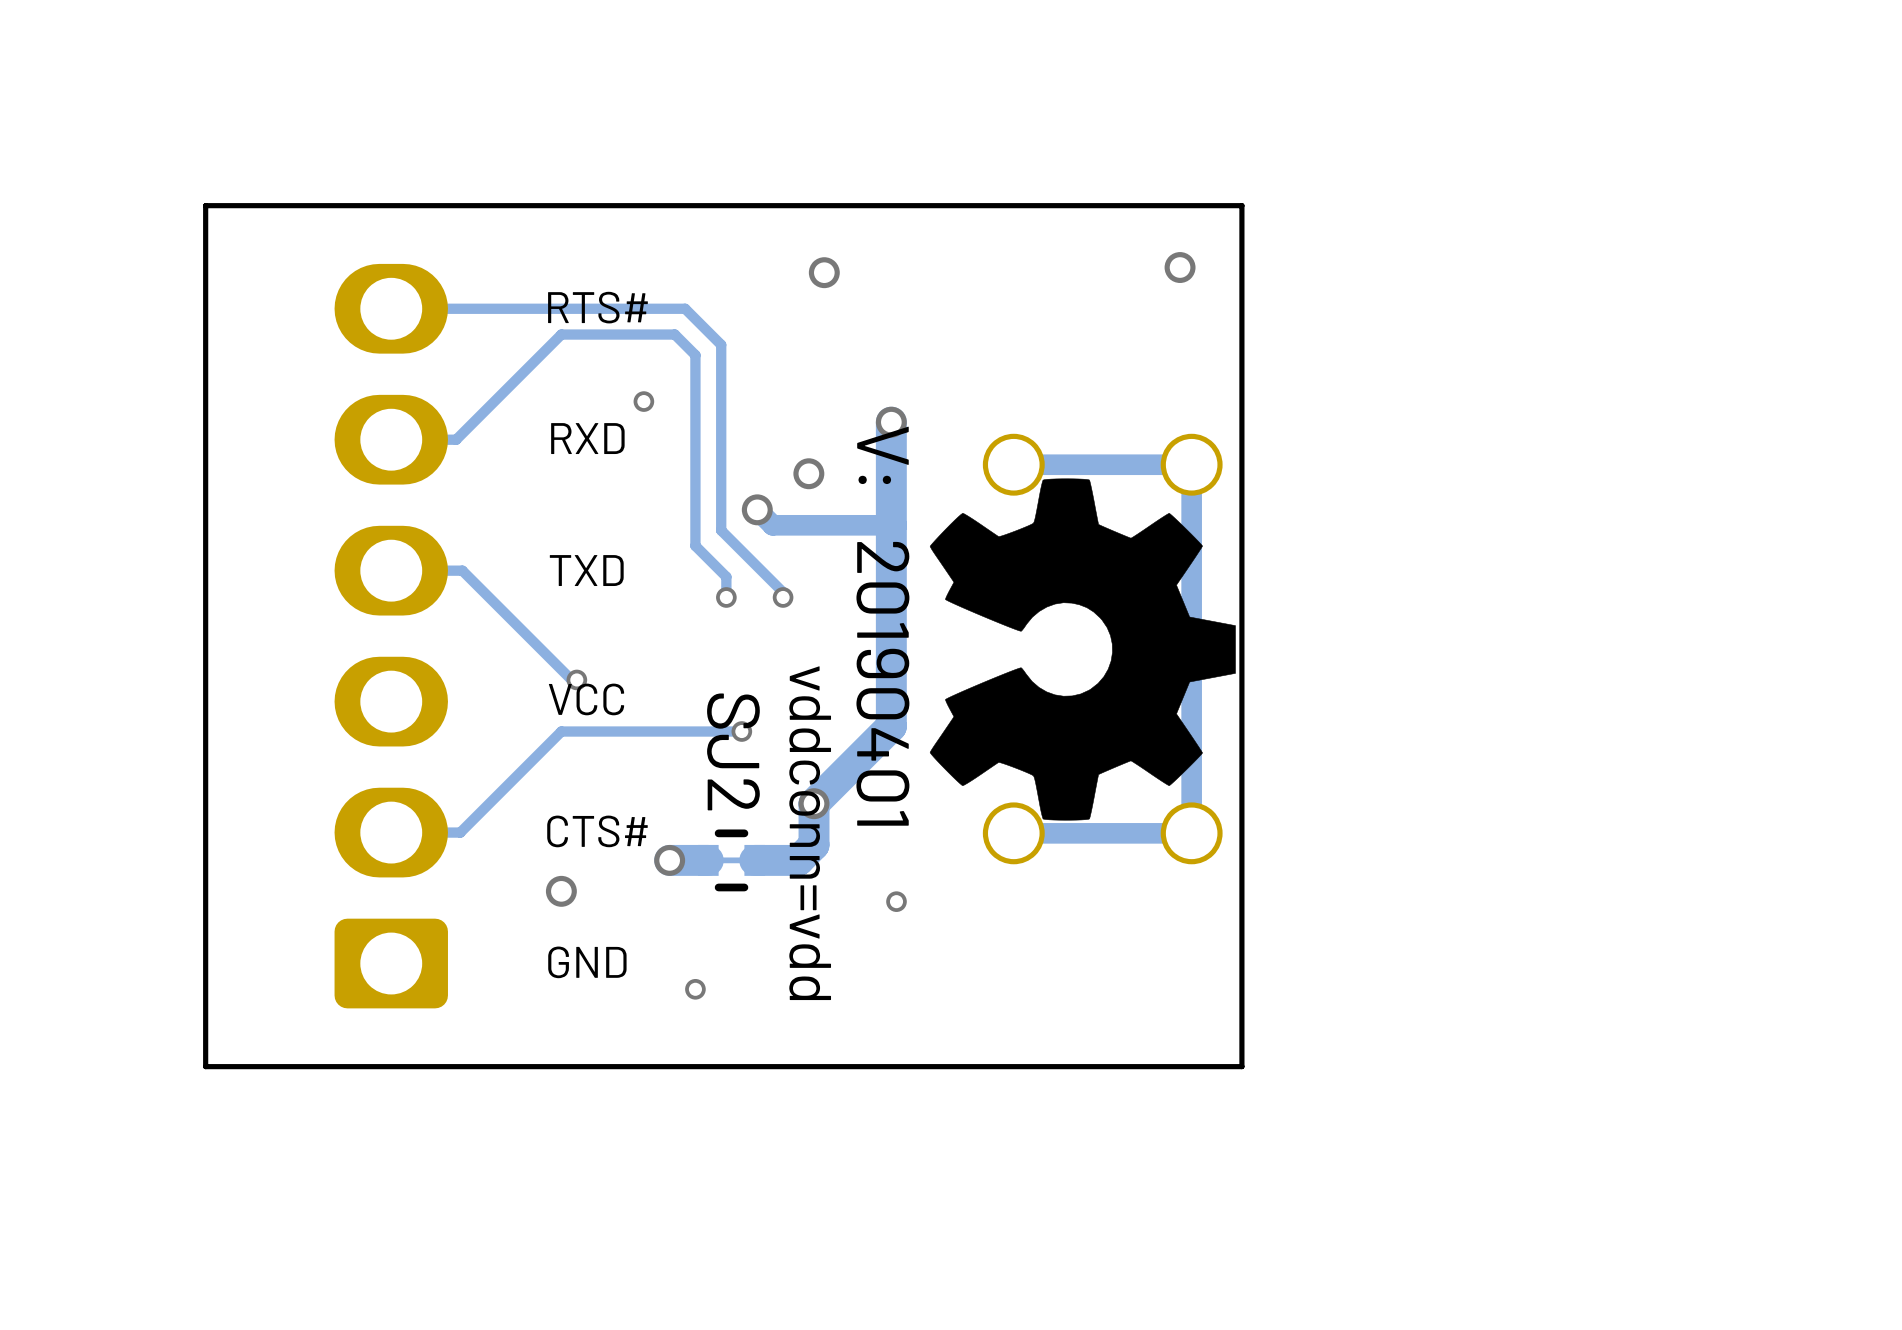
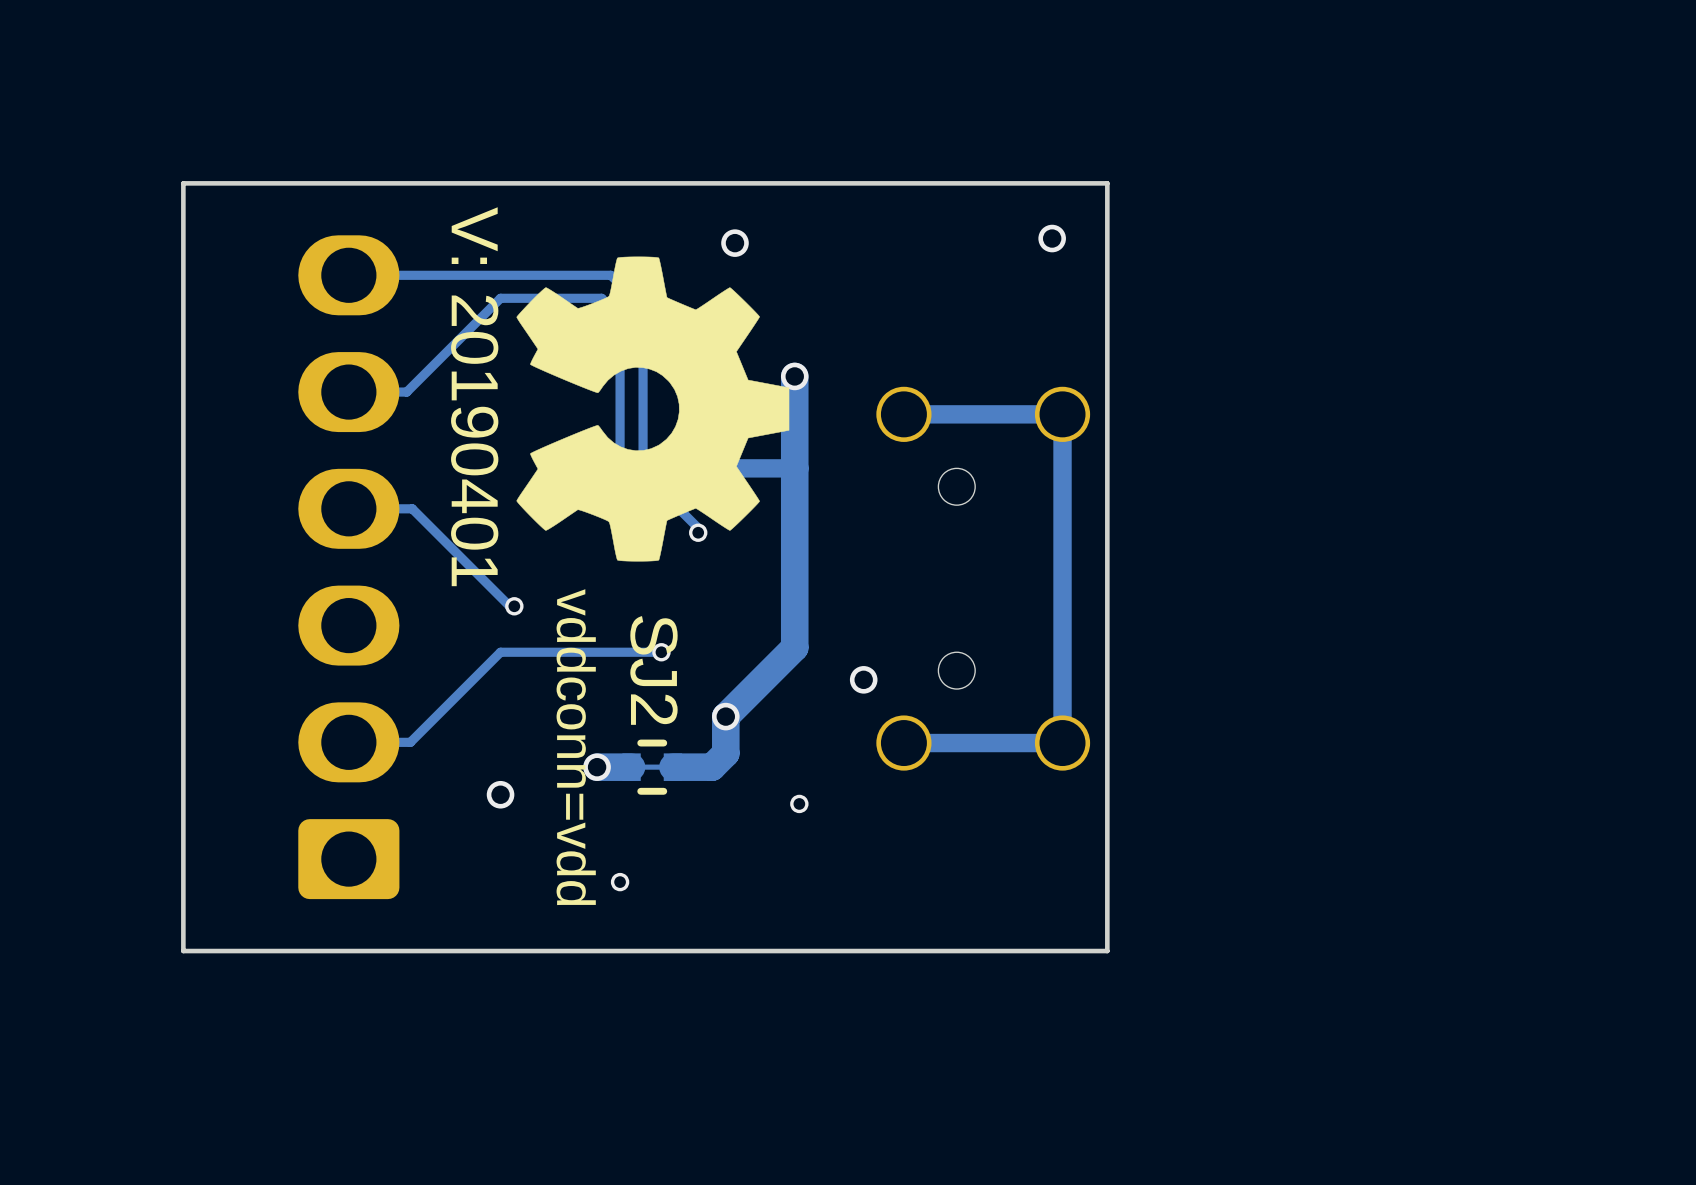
part text: RTS# (597, 307) -> none
part text: RXD (587, 438) -> none
part text: TXD (586, 570) -> none
drawing position: (882, 626) -> (474, 396)
drawing position: (1082, 649) -> (652, 409)
part text: VCC (586, 699) -> none
part text: CTS# (597, 831) -> none
SJ2 value position: vddconn=vdd (810, 833) -> vddconn=vdd (576, 747)
part text: GND (587, 962) -> none

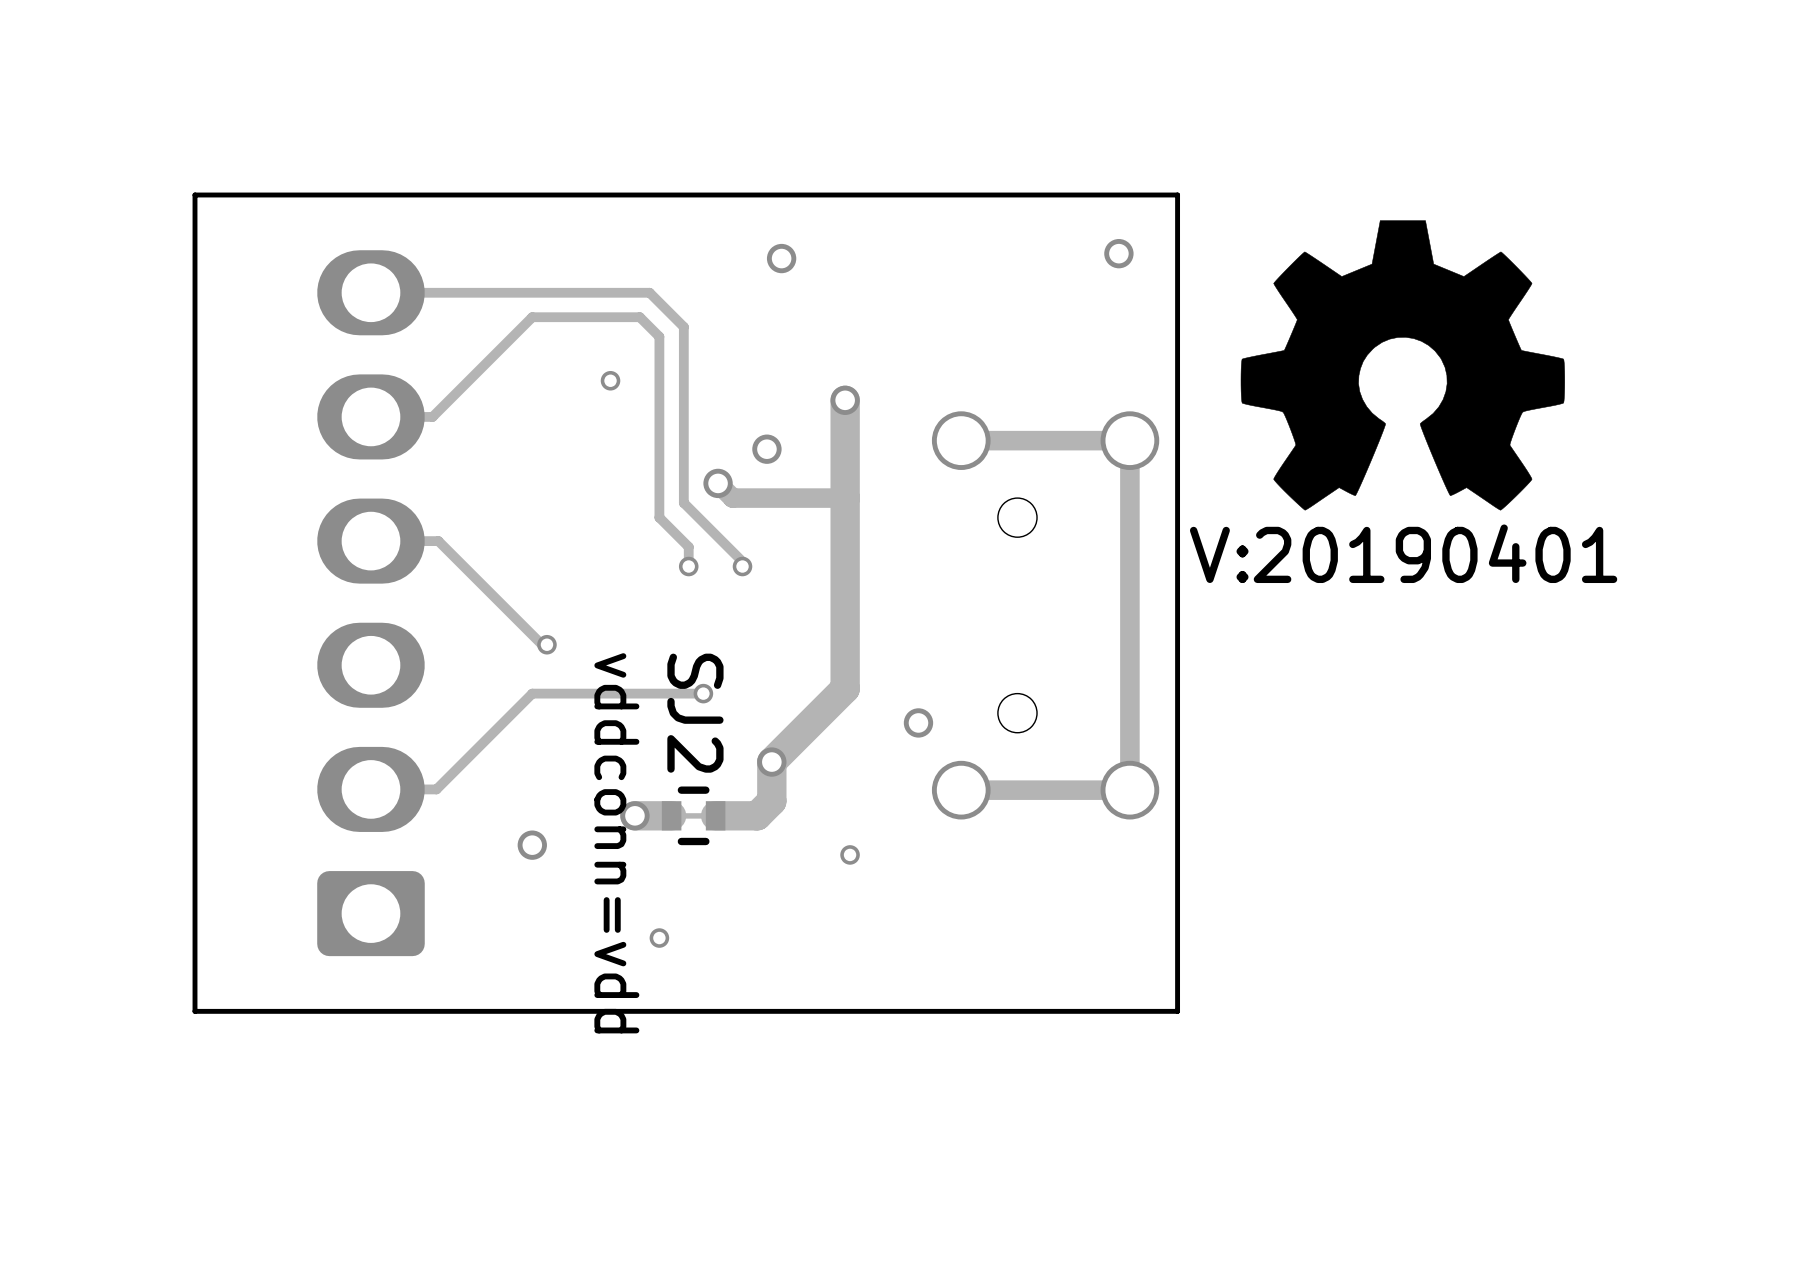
drawing: none -> [1240, 220, 1565, 511]
drawing: [516, 256, 790, 562] -> none
SJ2 value position: vddconn=vdd (576, 747) -> vddconn=vdd (616, 843)

